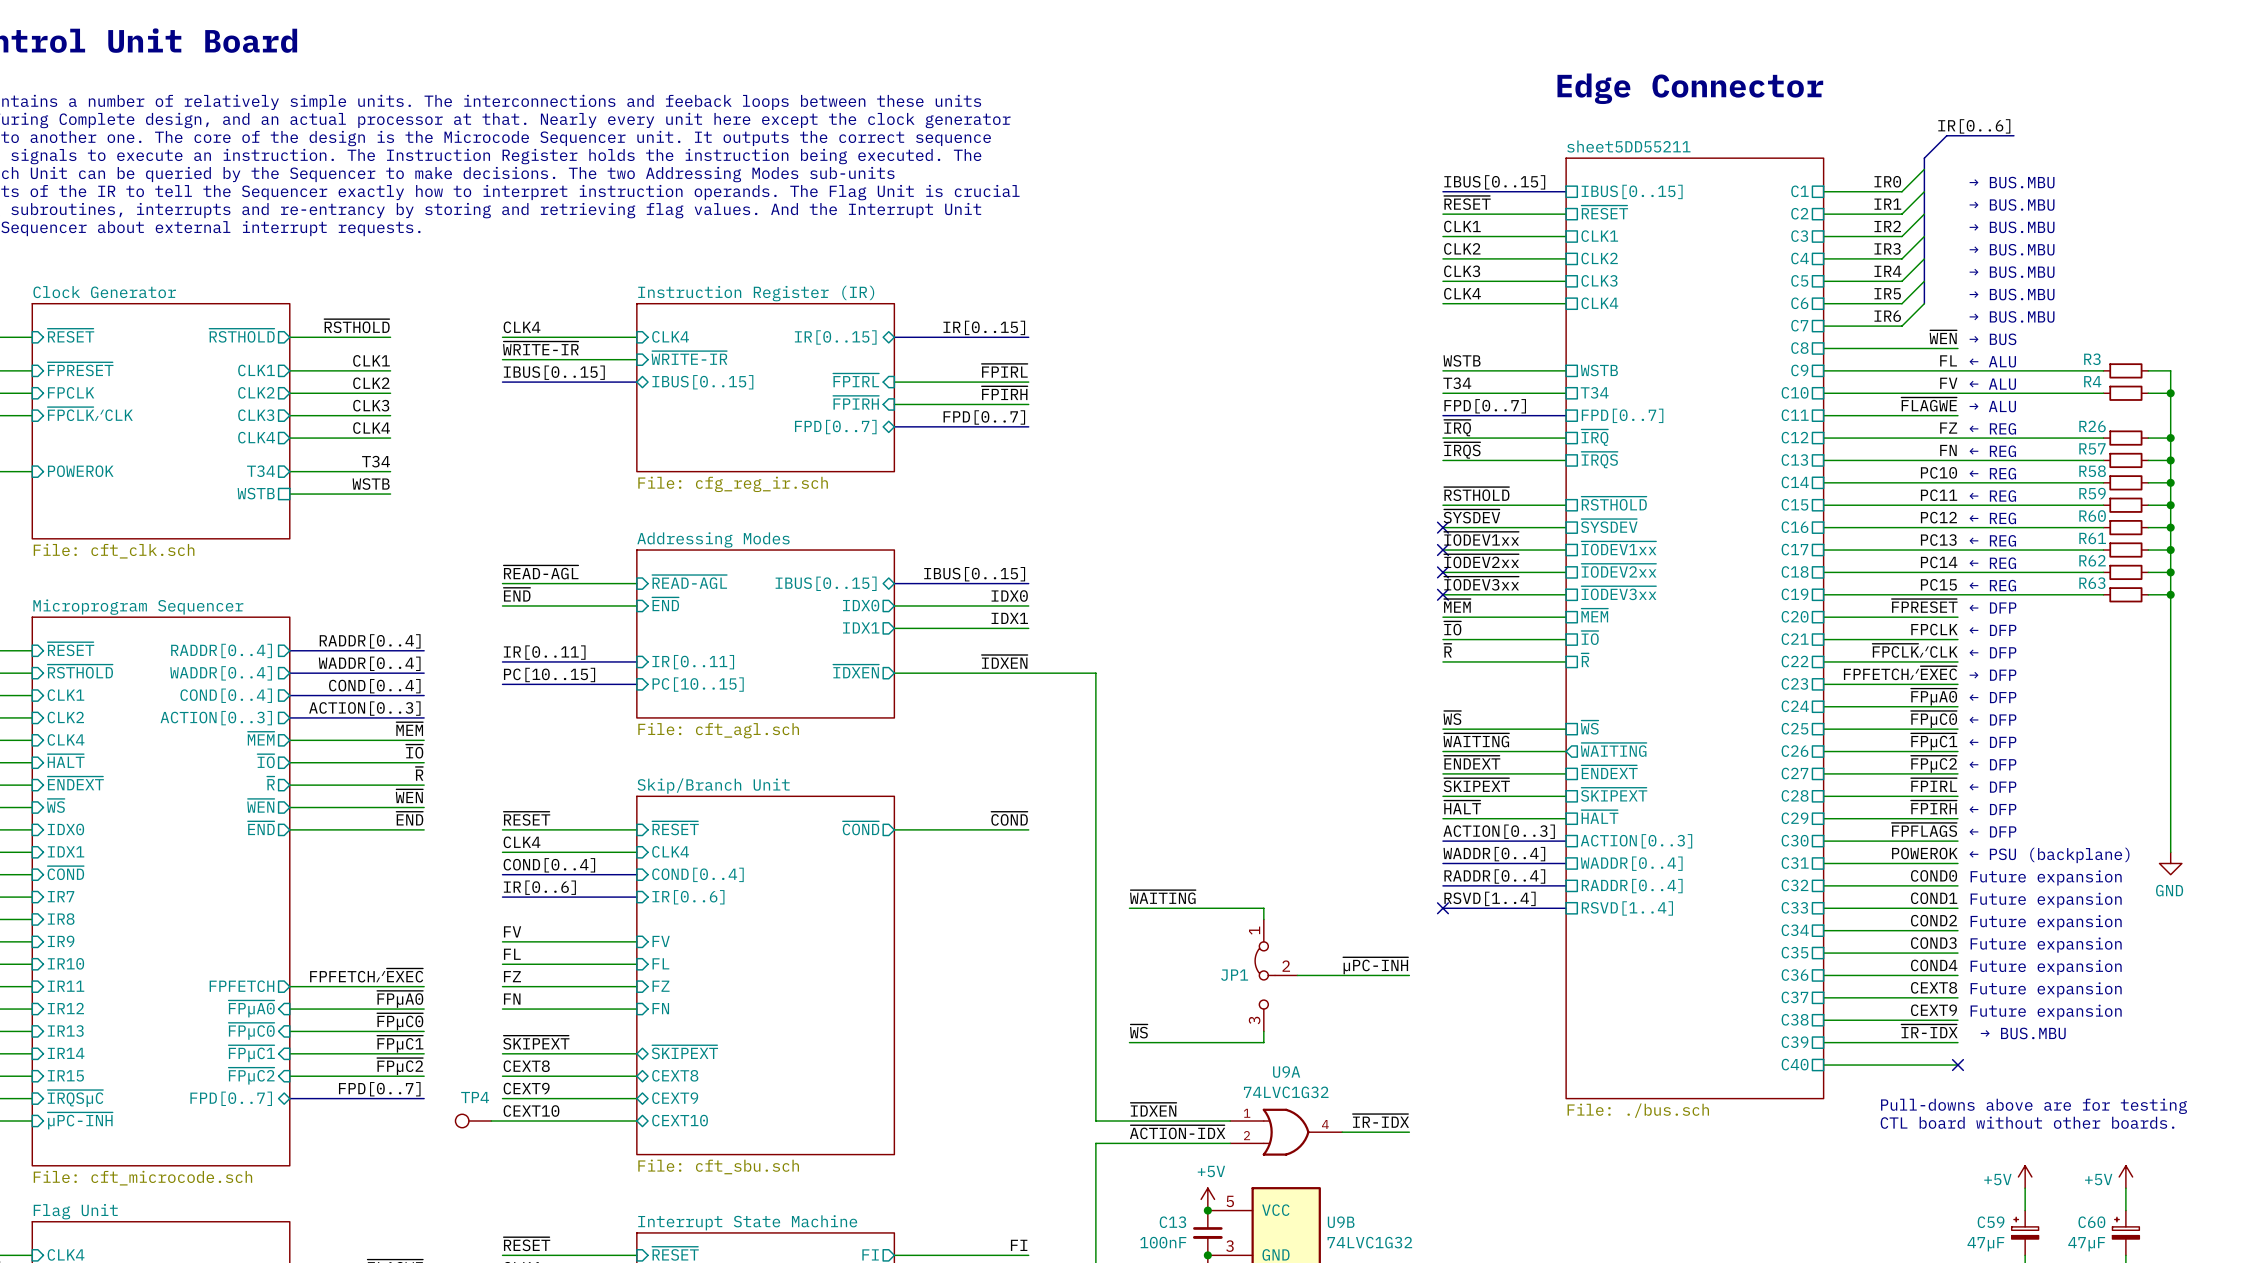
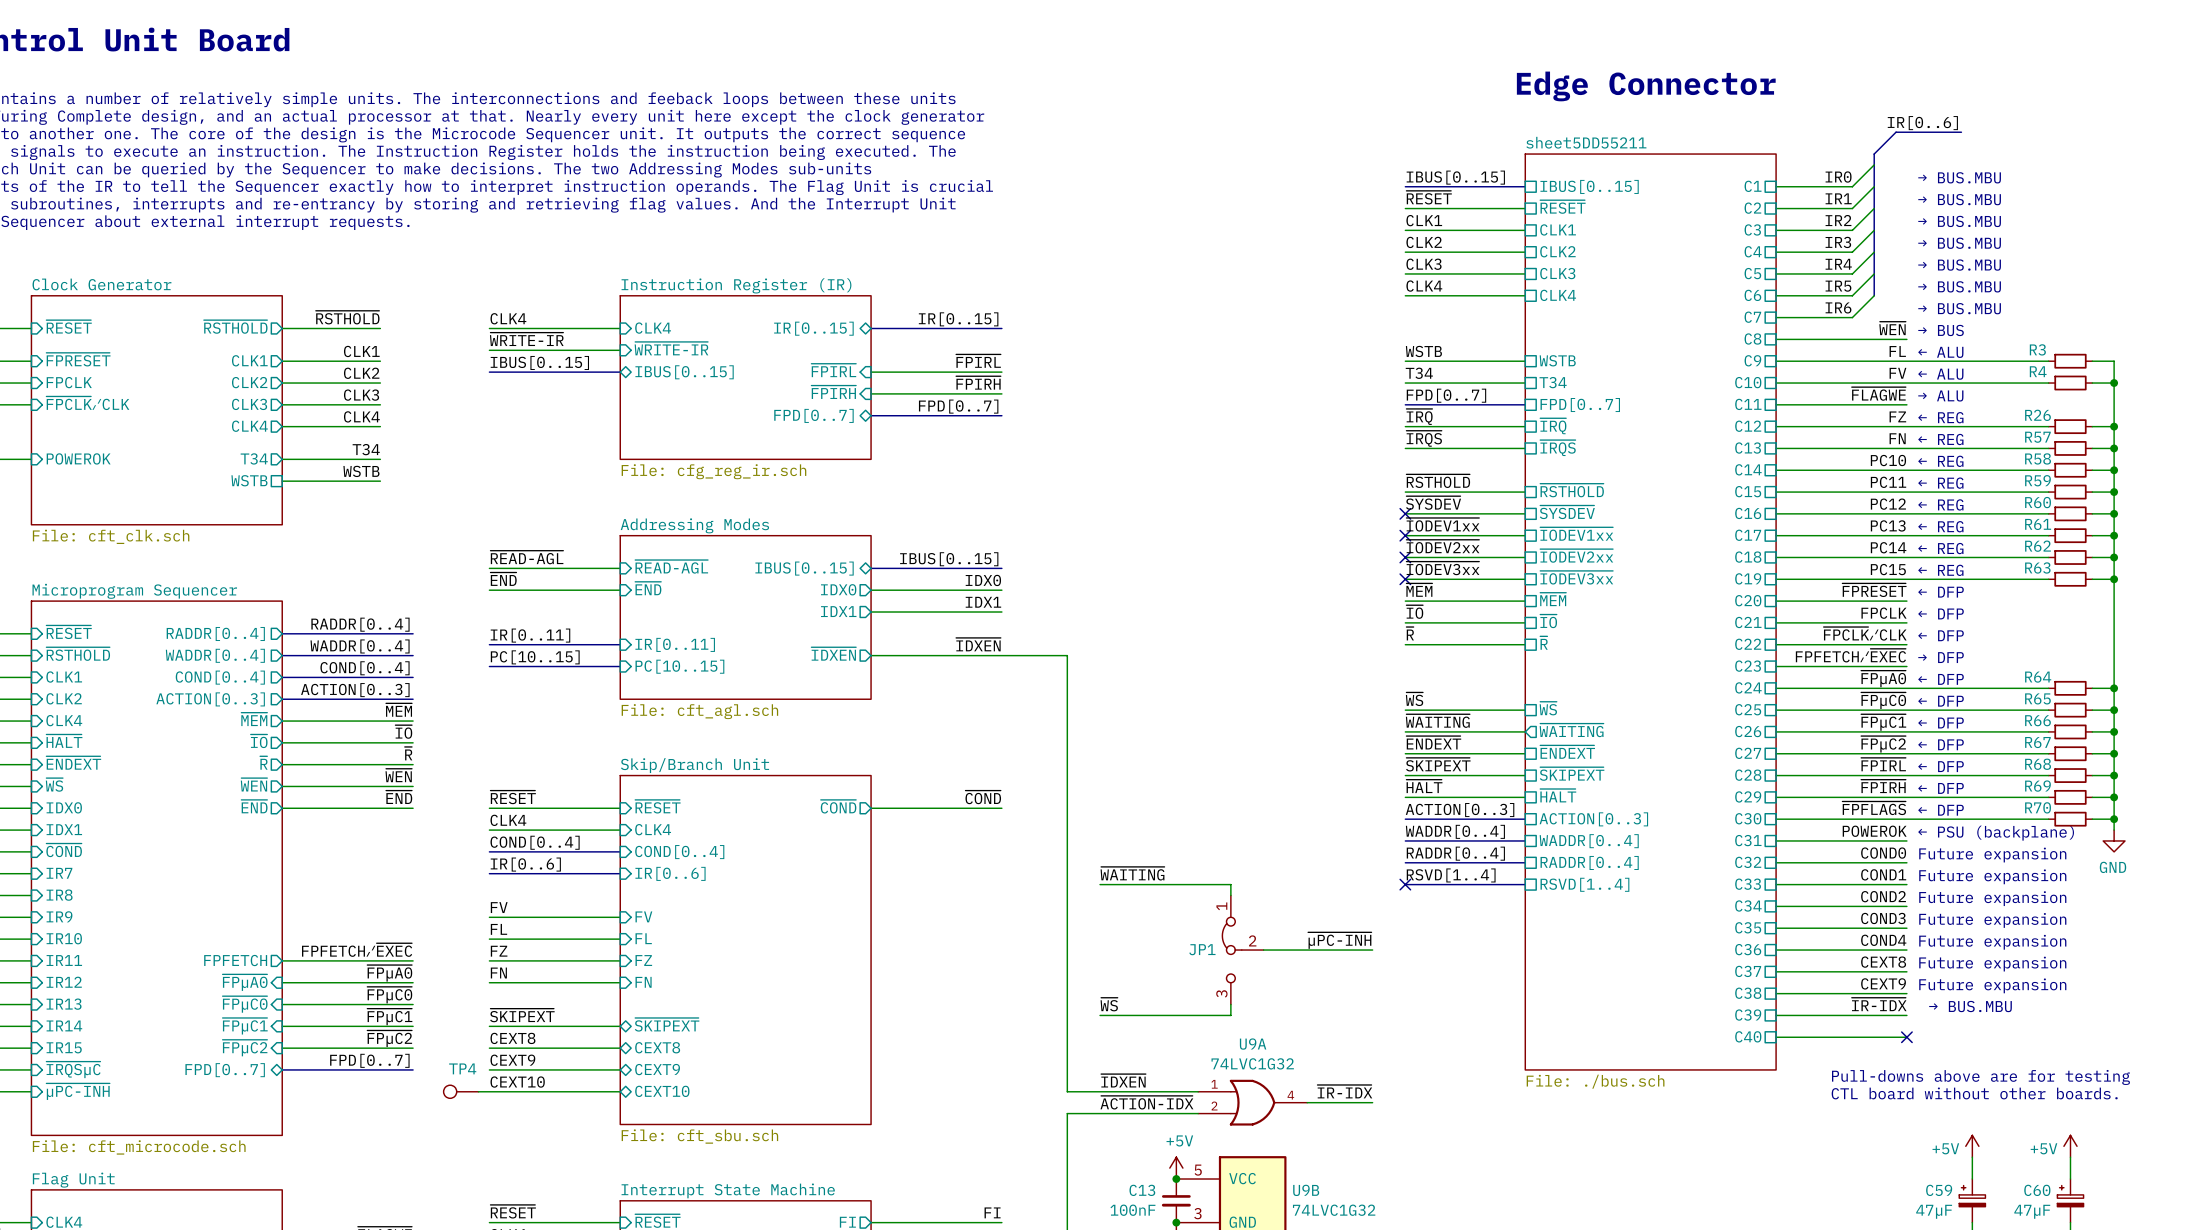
wire: none -> (1906, 688) (2048, 688)
R64: none -> (2070, 688)
wire: none -> (2092, 688) (2114, 688)
junction: none -> (2114, 688)
wire: none -> (1906, 710) (2048, 710)
R65: none -> (2070, 710)
wire: none -> (2092, 710) (2114, 710)
junction: none -> (2114, 710)
wire: none -> (1906, 731) (2048, 731)
R66: none -> (2070, 731)
wire: none -> (2092, 731) (2114, 731)
junction: none -> (2114, 731)
wire: none -> (1906, 753) (2048, 753)
R67: none -> (2070, 753)
wire: none -> (2092, 753) (2114, 753)
junction: none -> (2114, 753)
wire: none -> (1906, 775) (2048, 775)
R68: none -> (2070, 775)
wire: none -> (2092, 775) (2114, 775)
junction: none -> (2114, 775)
wire: none -> (1906, 797) (2048, 797)
R69: none -> (2070, 797)
wire: none -> (2092, 797) (2114, 797)
junction: none -> (2114, 797)
wire: none -> (1906, 819) (2048, 819)
R70: none -> (2070, 819)
wire: none -> (2092, 819) (2114, 819)
junction: none -> (2114, 819)

